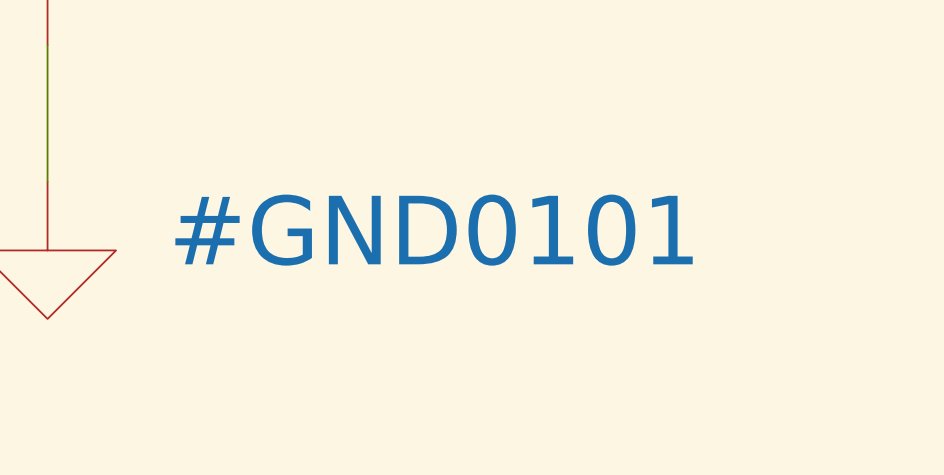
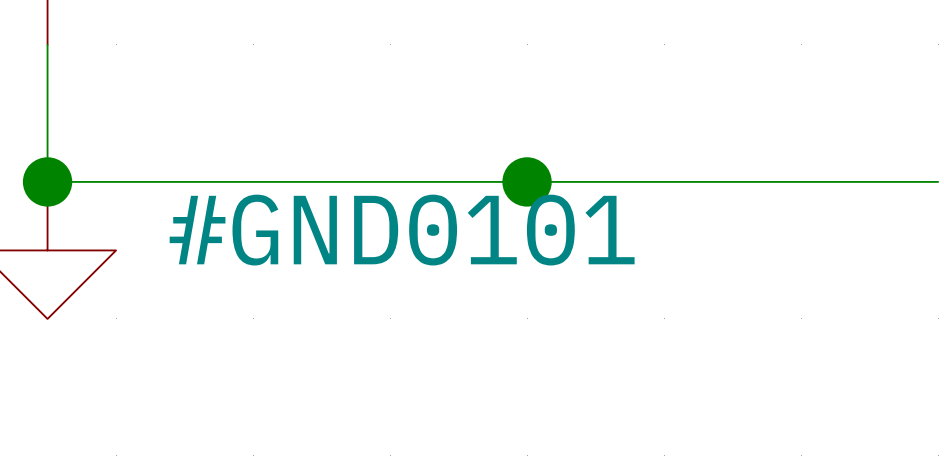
wire: none -> (47, 181) (938, 181)
junction: none -> (47, 181)
junction: none -> (527, 181)

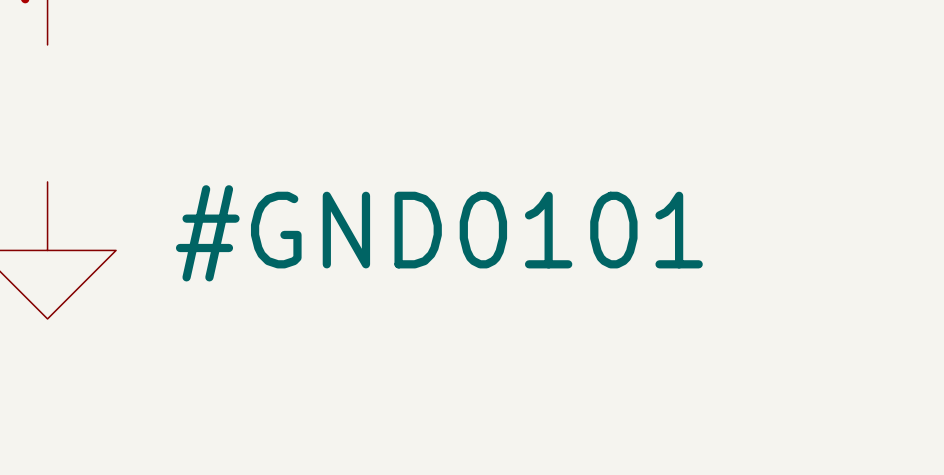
wire: (47, 44) (47, 181) (938, 181) -> none
junction: (47, 181) -> none
junction: (527, 181) -> none

